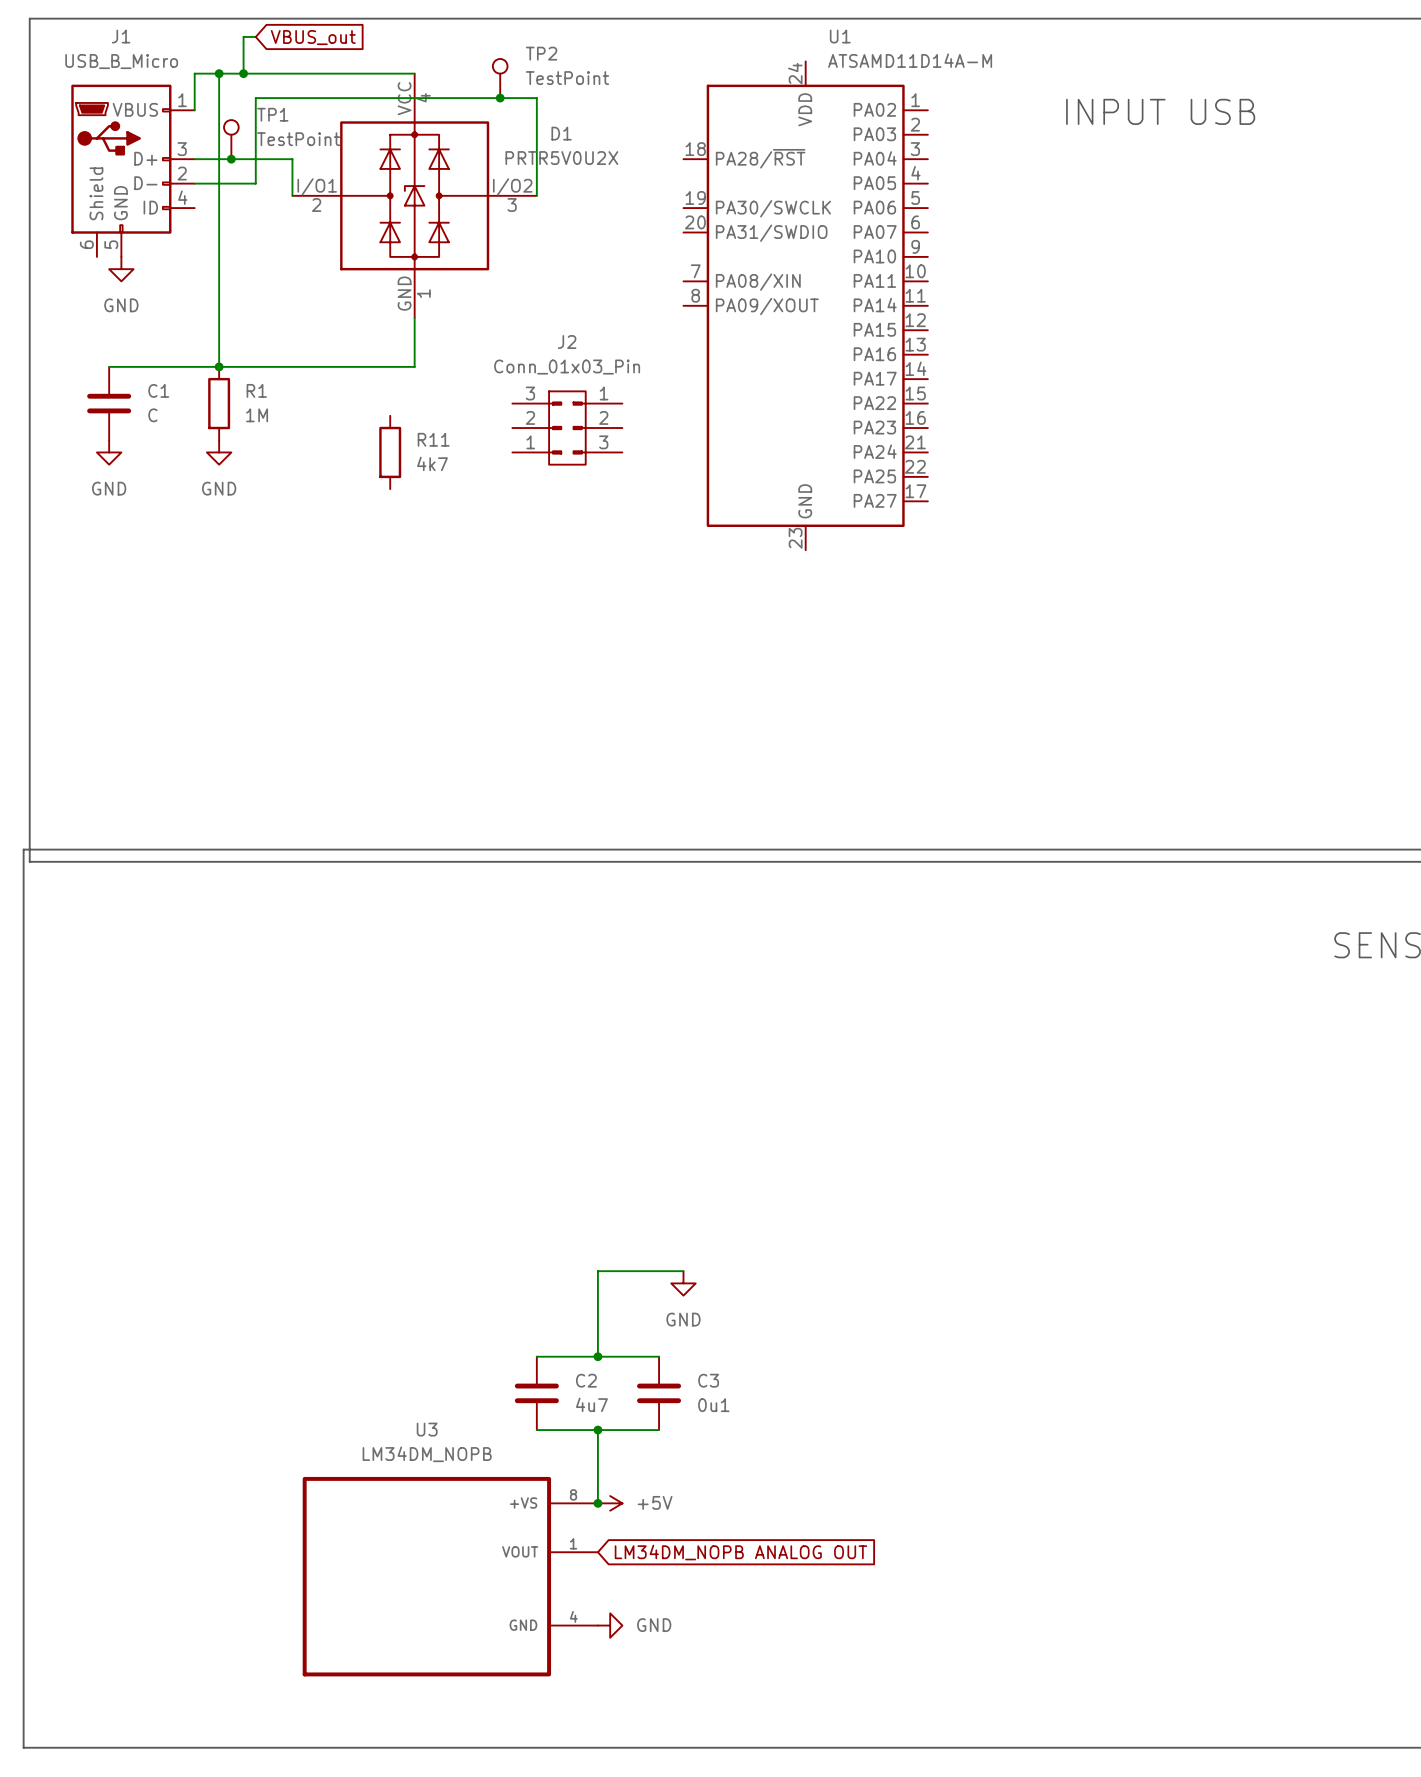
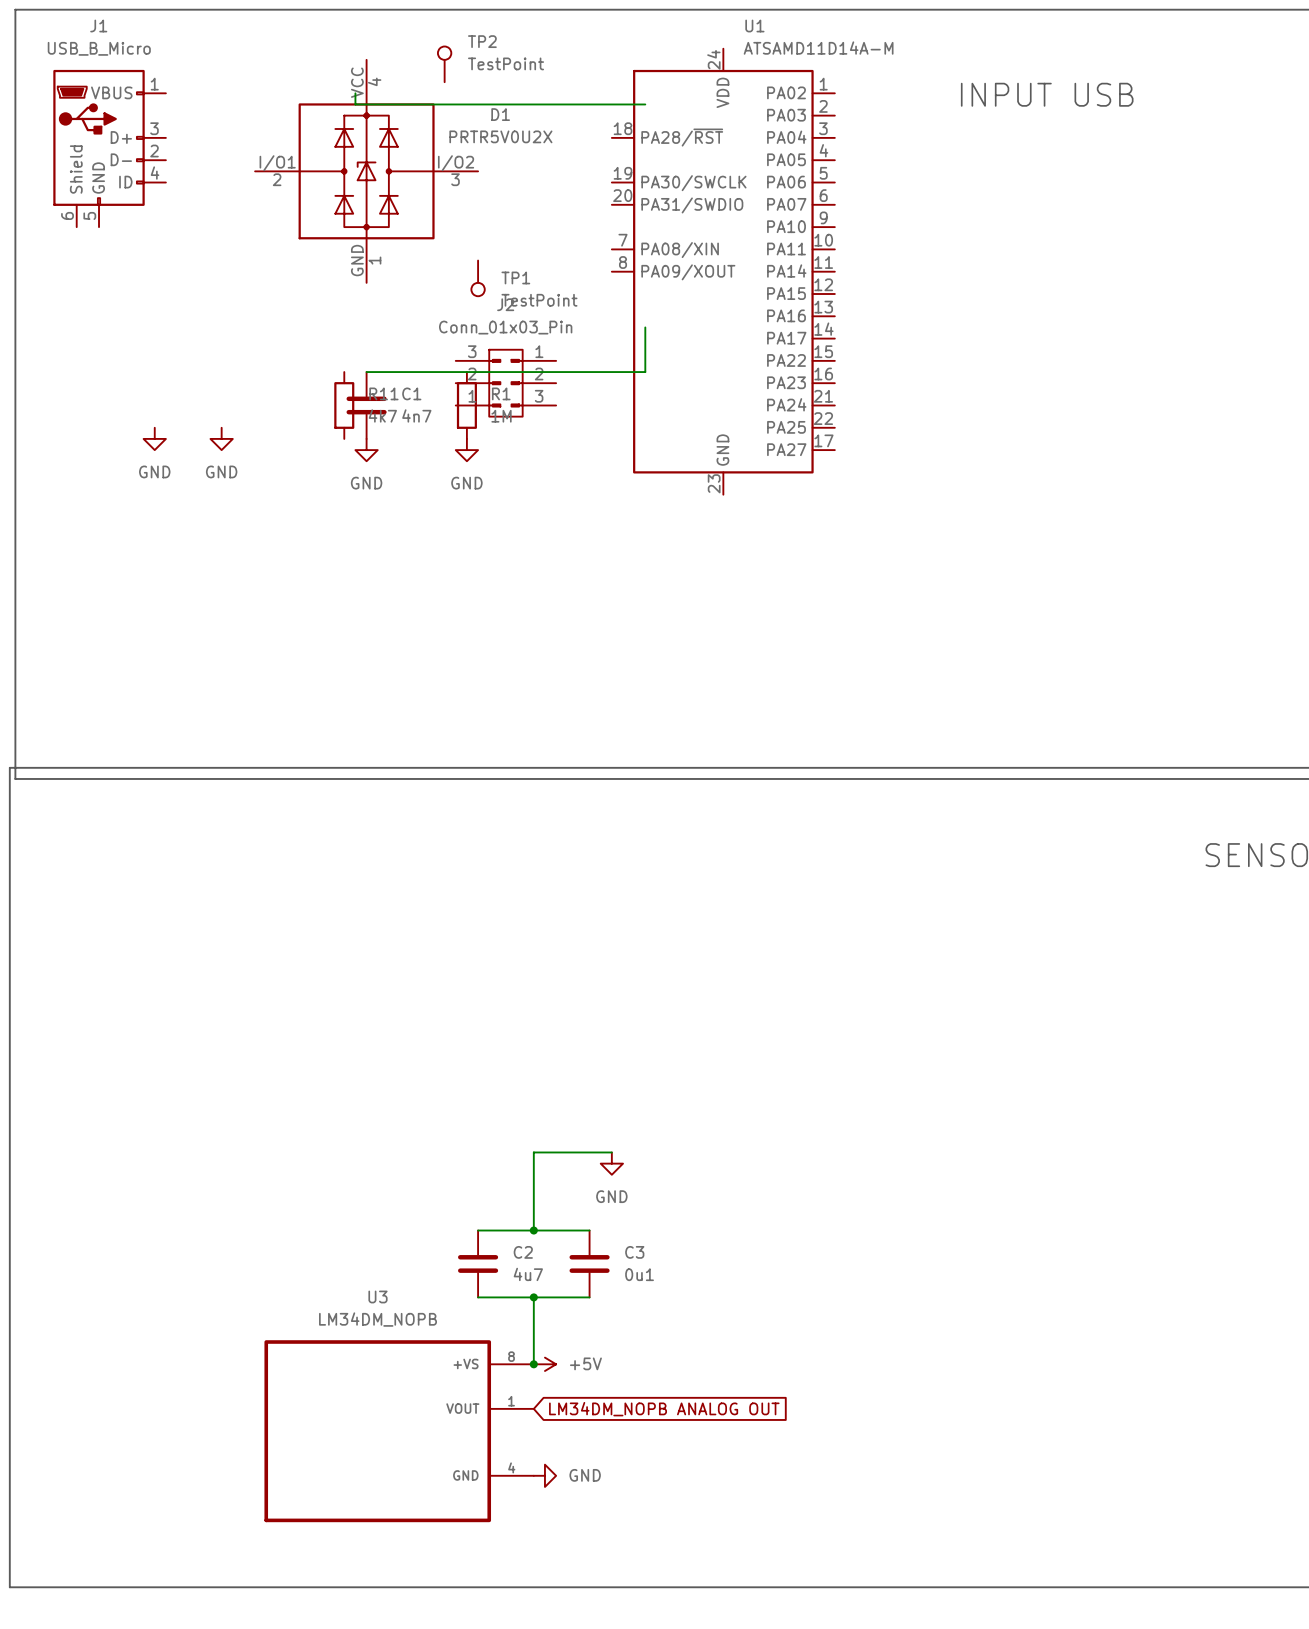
wire: (255, 36) (243, 36) (243, 73) -> none
global label: VBUS_out (313, 37) -> none
wire: (219, 73) (219, 366) -> none
junction: (219, 73) -> none
junction: (243, 73) -> none
wire: (414, 73) (194, 73) (194, 110) -> none
junction: (500, 98) -> none
wire: none -> (355, 93) (355, 104) (645, 104)
TP1 name position: TP1 (272, 114) -> TP1 (515, 277)
TP1 rotation: 0° (231, 127) -> 180° (478, 289)
TP1 position: (231, 139) -> (478, 278)
TP1 value position: TestPoint (298, 139) -> TestPoint (539, 300)
wire: (194, 159) (292, 159) (292, 195) -> none
junction: (231, 159) -> none
wire: (194, 183) (255, 183) (255, 98) (536, 98) (536, 195) -> none
power symbol: GND (121, 269) -> none
wire: (414, 318) (414, 366) (109, 366) -> none
junction: (219, 366) -> none
wire: none -> (645, 327) (645, 372) (366, 372)
C1 position: (109, 403) -> (366, 405)
R1 position: (219, 403) -> (466, 405)
C1 value: C (152, 415) -> 4n7 (416, 415)
power symbol: GND (109, 452) -> none
power symbol: GND (219, 452) -> none
power symbol: none -> GND (154, 438)
power symbol: none -> GND (221, 438)
power symbol: none -> GND (366, 450)
power symbol: none -> GND (466, 450)

